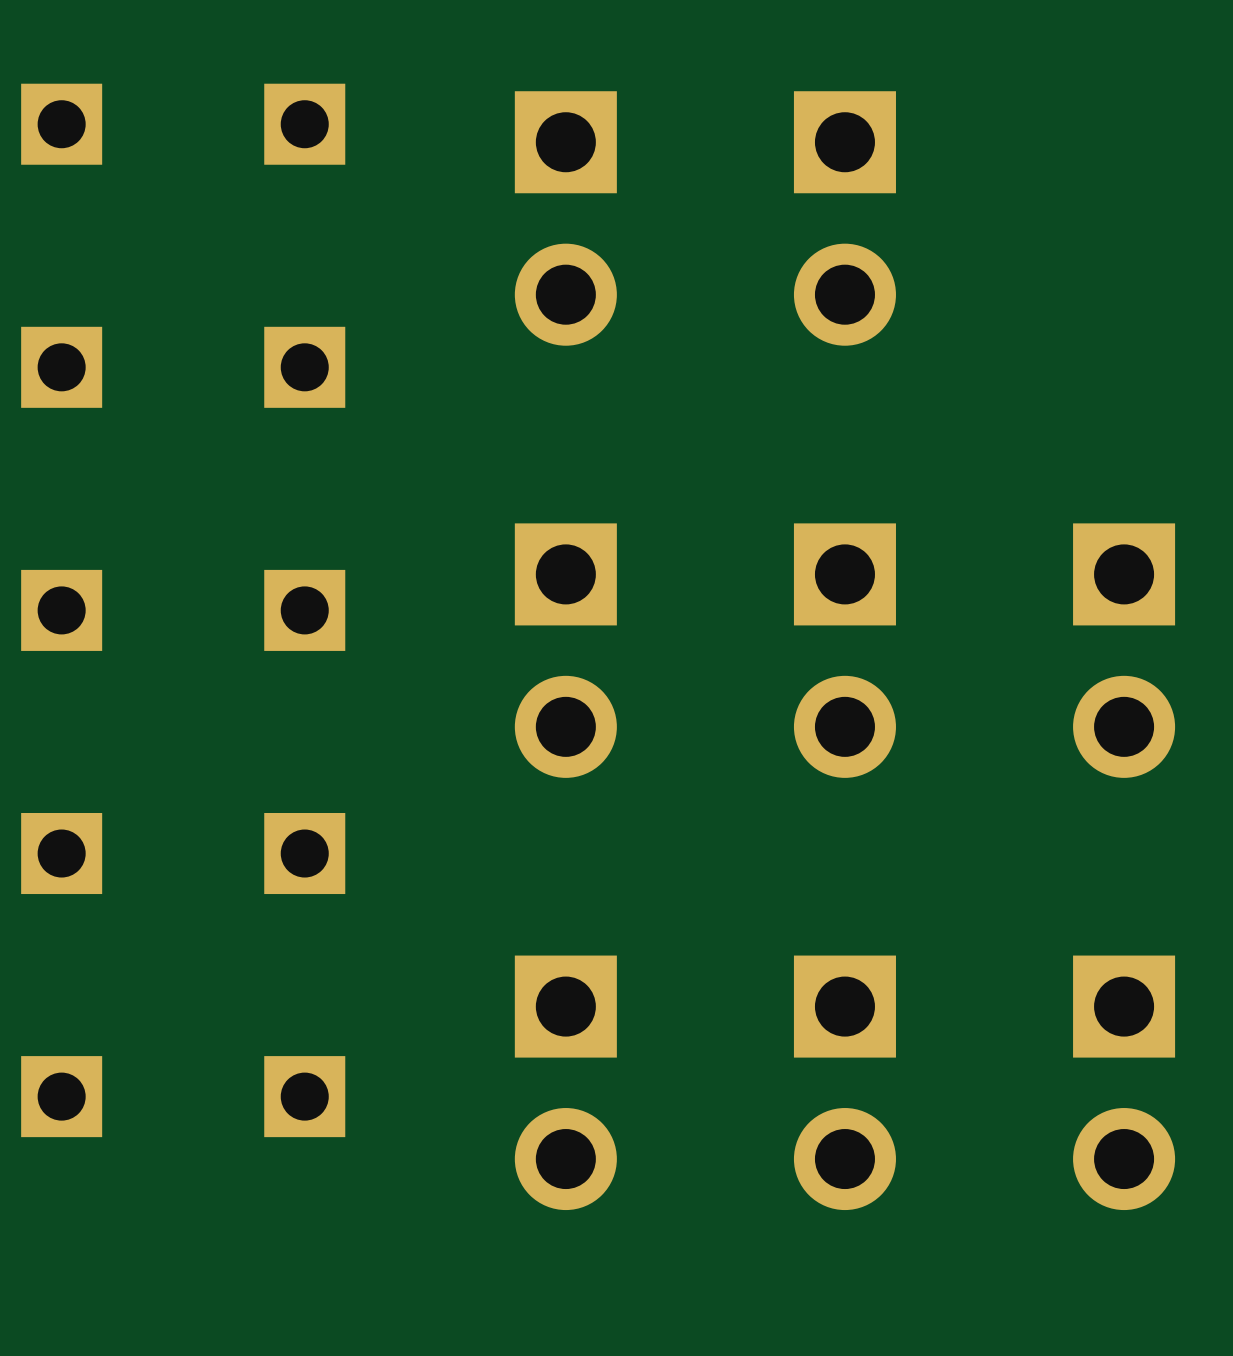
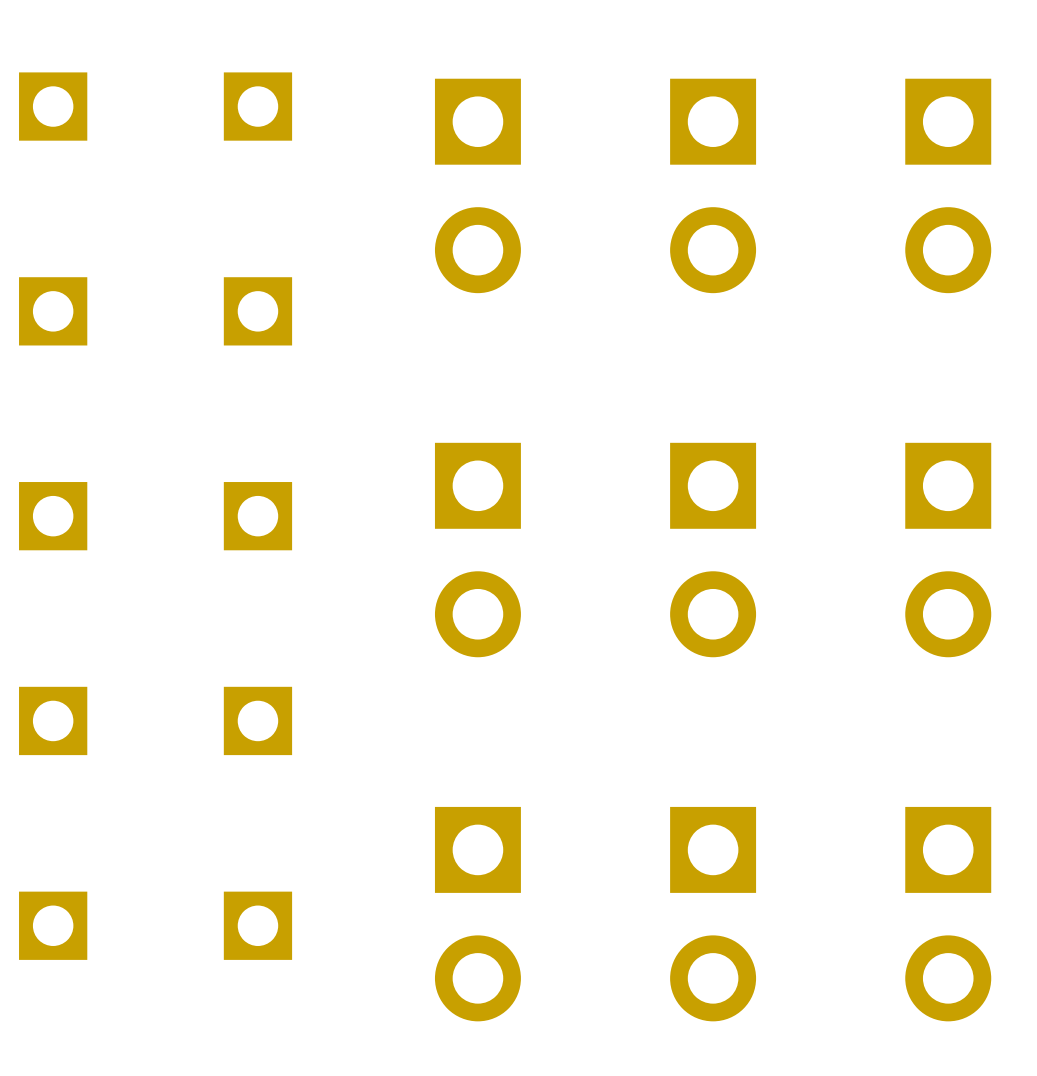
part: none -> (948, 185)

